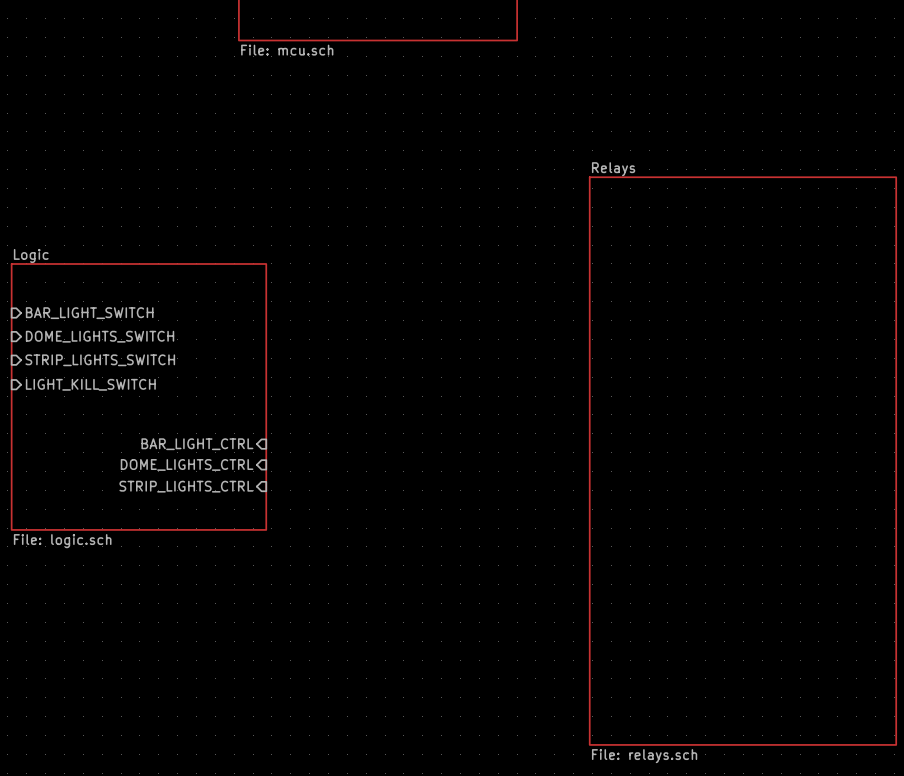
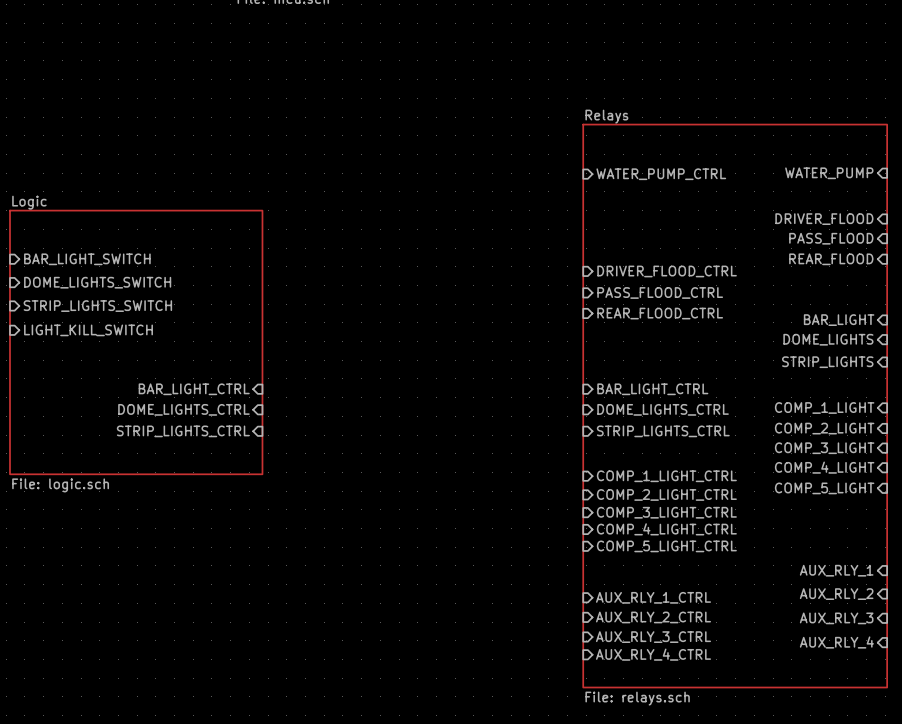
sheet pin: none -> WATER_PUMP (829, 173)
sheet pin: none -> WATER_PUMP_CTRL (661, 174)
sheet pin: none -> DRIVER_FLOOD (824, 219)
sheet pin: none -> PASS_FLOOD (831, 238)
sheet pin: none -> REAR_FLOOD (831, 259)
sheet pin: none -> DRIVER_FLOOD_CTRL (667, 271)
sheet pin: none -> PASS_FLOOD_CTRL (660, 292)
sheet pin: none -> REAR_FLOOD_CTRL (660, 313)
sheet pin: none -> BAR_LIGHT (839, 320)
sheet pin: none -> DOME_LIGHTS (828, 339)
sheet pin: none -> STRIP_LIGHTS (827, 362)
sheet pin: none -> BAR_LIGHT_CTRL (652, 389)
sheet pin: none -> COMP_1_LIGHT (824, 408)
sheet pin: none -> DOME_LIGHTS_CTRL (663, 409)
sheet pin: none -> COMP_2_LIGHT (824, 428)
sheet pin: none -> STRIP_LIGHTS_CTRL (663, 431)
sheet pin: none -> COMP_3_LIGHT (824, 448)
sheet pin: none -> COMP_4_LIGHT (824, 467)
sheet pin: none -> COMP_1_LIGHT_CTRL (666, 476)
sheet pin: none -> COMP_5_LIGHT (824, 488)
sheet pin: none -> COMP_2_LIGHT_CTRL (666, 494)
sheet pin: none -> COMP_3_LIGHT_CTRL (666, 512)
sheet pin: none -> COMP_4_LIGHT_CTRL (666, 529)
sheet pin: none -> COMP_5_LIGHT_CTRL (666, 546)
sheet pin: none -> AUX_RLY_1 (836, 570)
sheet pin: none -> AUX_RLY_2 (836, 594)
sheet pin: none -> AUX_RLY_1_CTRL (653, 597)
sheet pin: none -> AUX_RLY_2_CTRL (653, 617)
sheet pin: none -> AUX_RLY_3 (836, 618)
sheet pin: none -> AUX_RLY_3_CTRL (653, 637)
sheet pin: none -> AUX_RLY_4 (836, 642)
sheet pin: none -> AUX_RLY_4_CTRL (653, 654)

